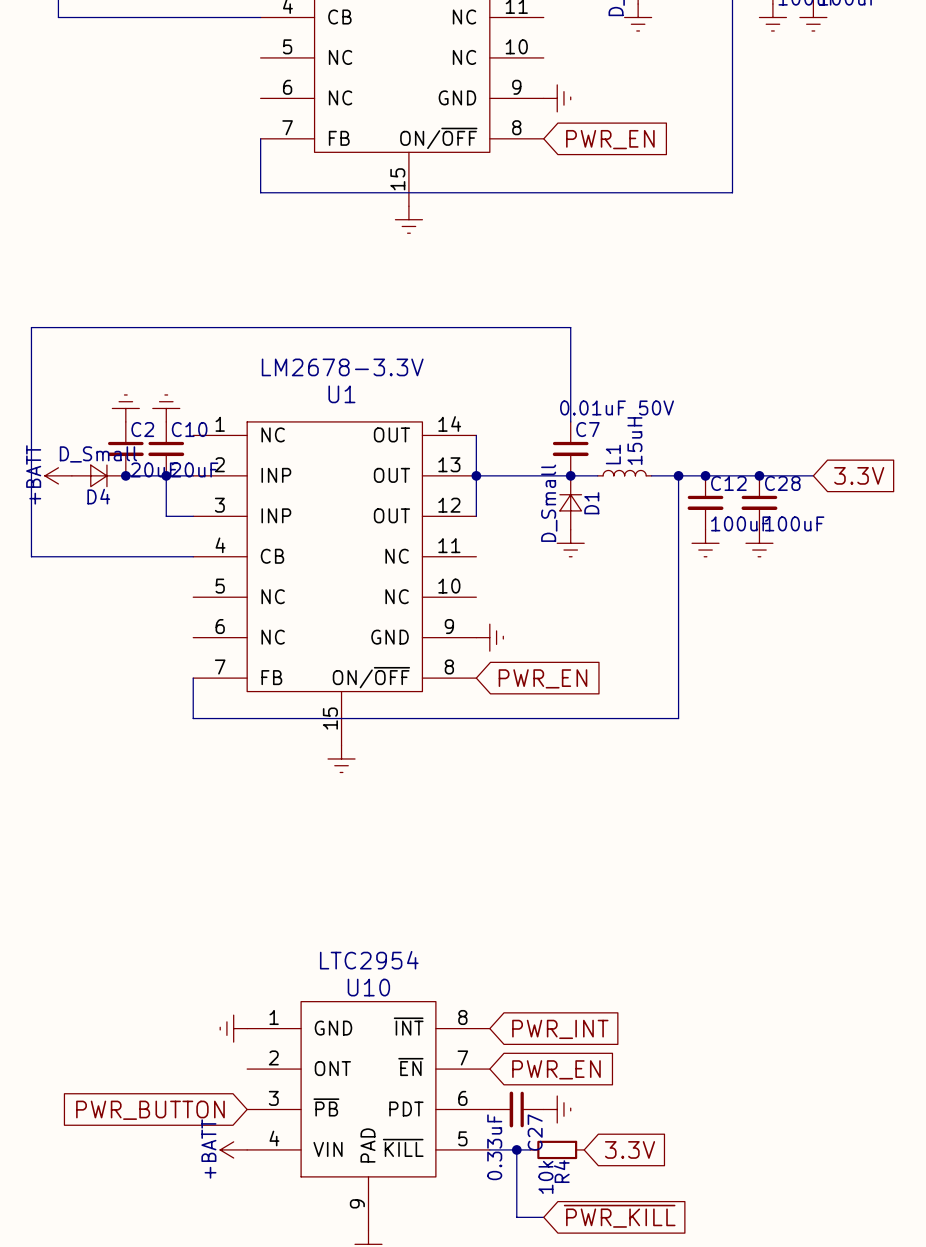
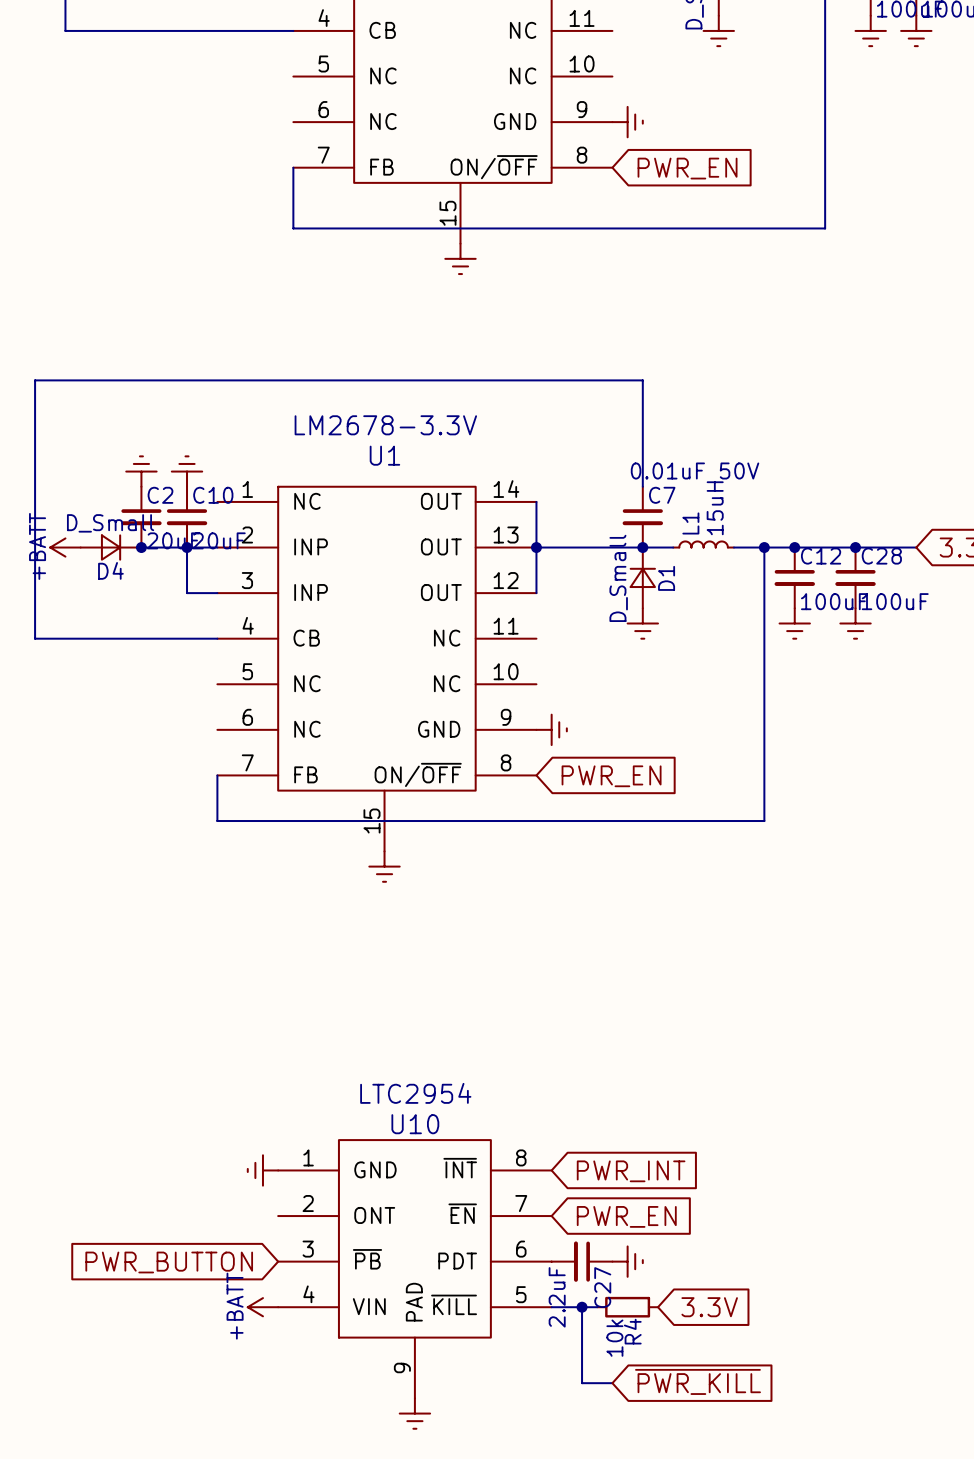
C27 value: 0.33uF (494, 1147) -> 2.2uF (557, 1297)

